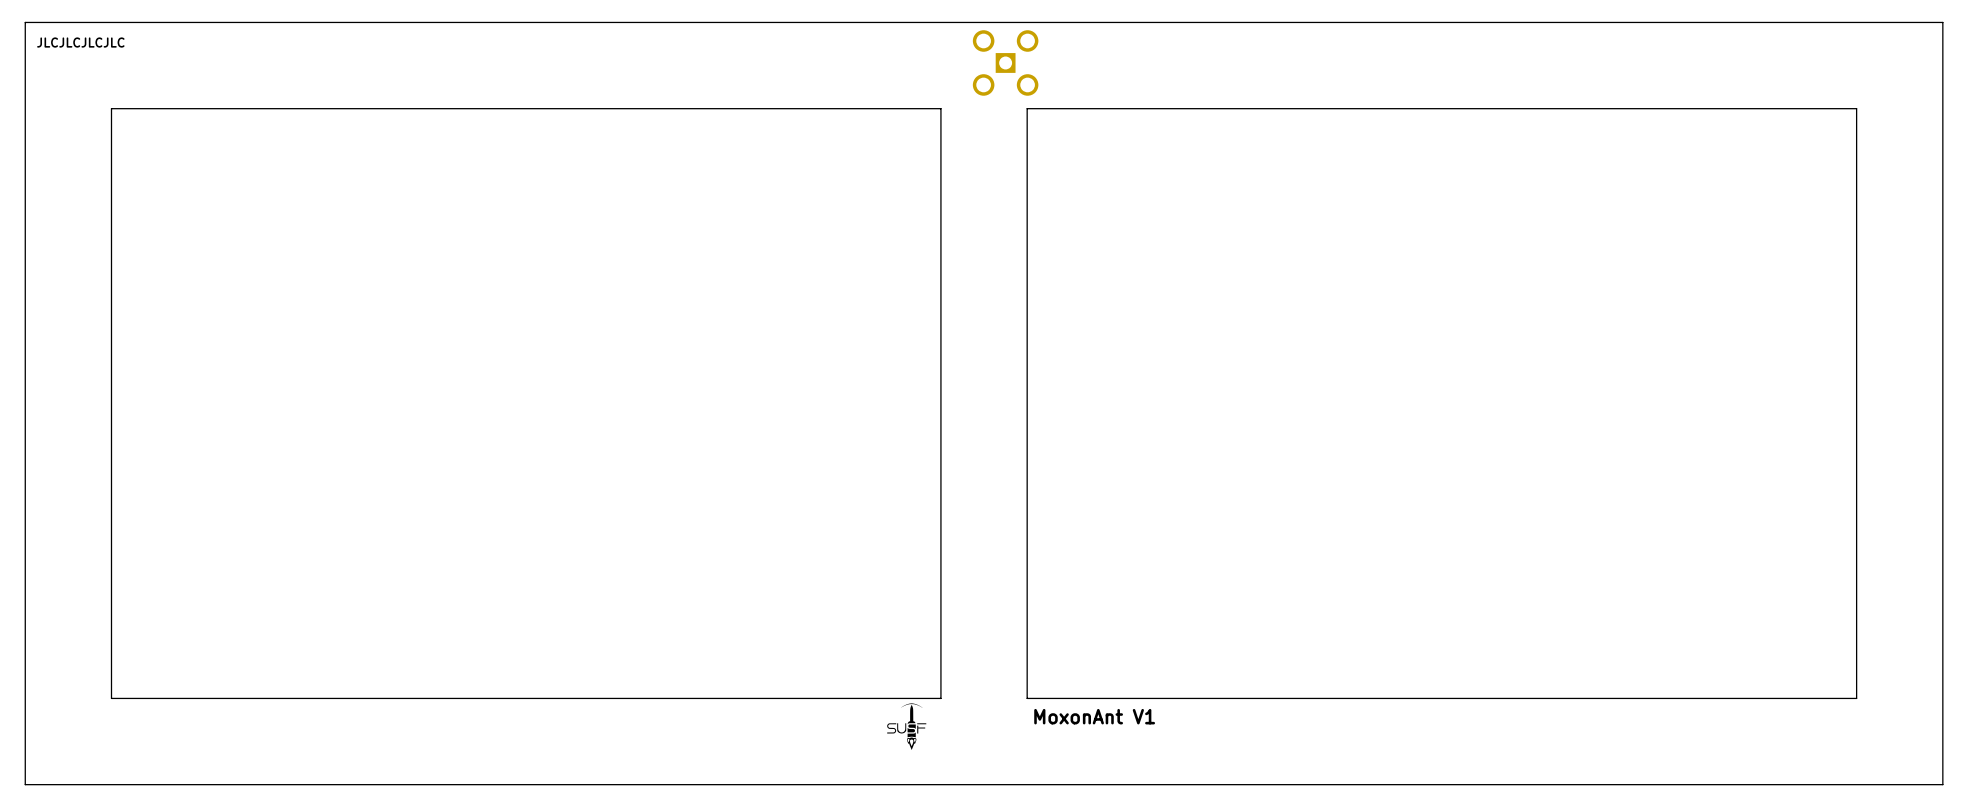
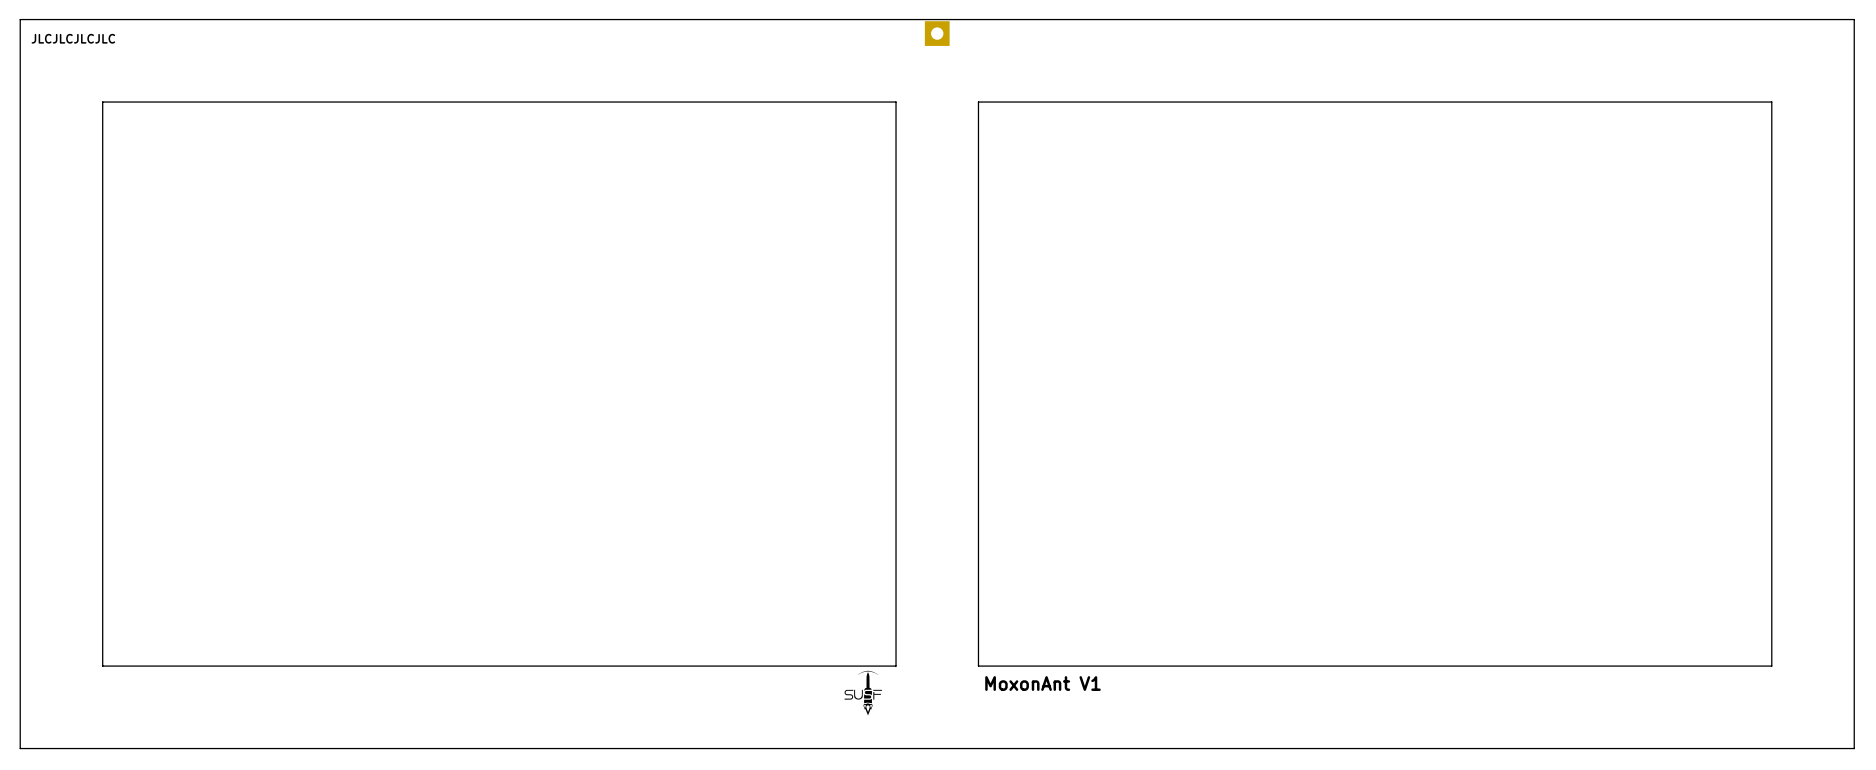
part: none -> (937, 33)
part: (1005, 62) -> none

